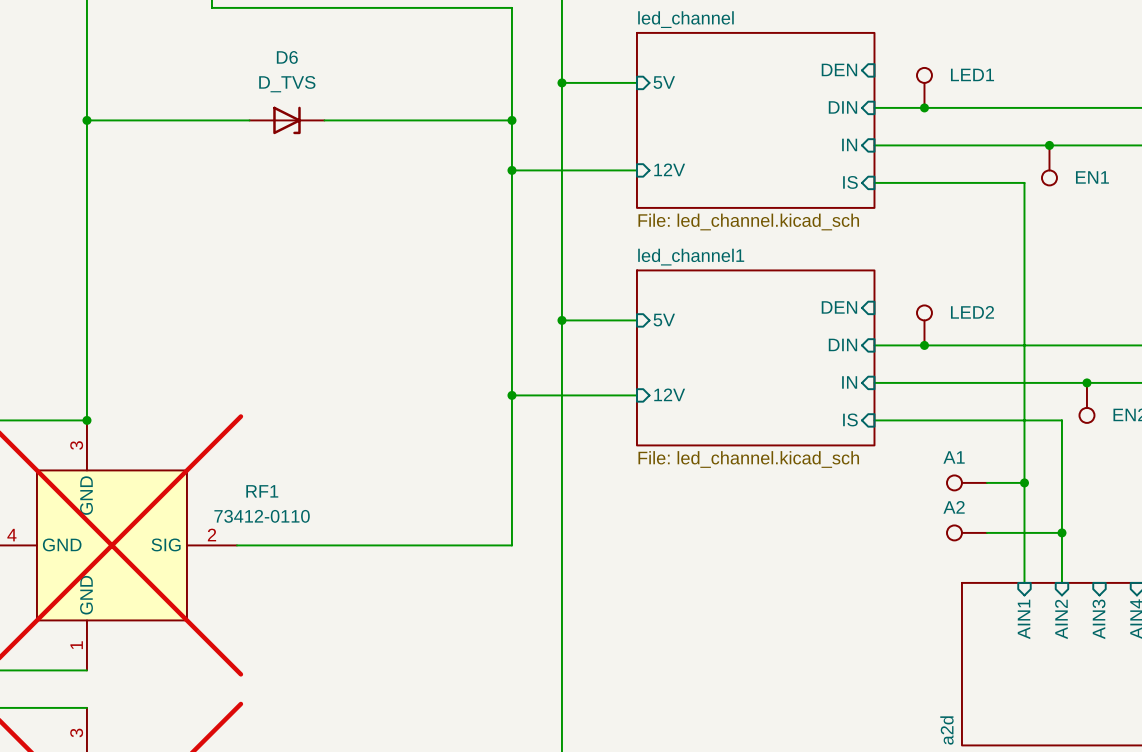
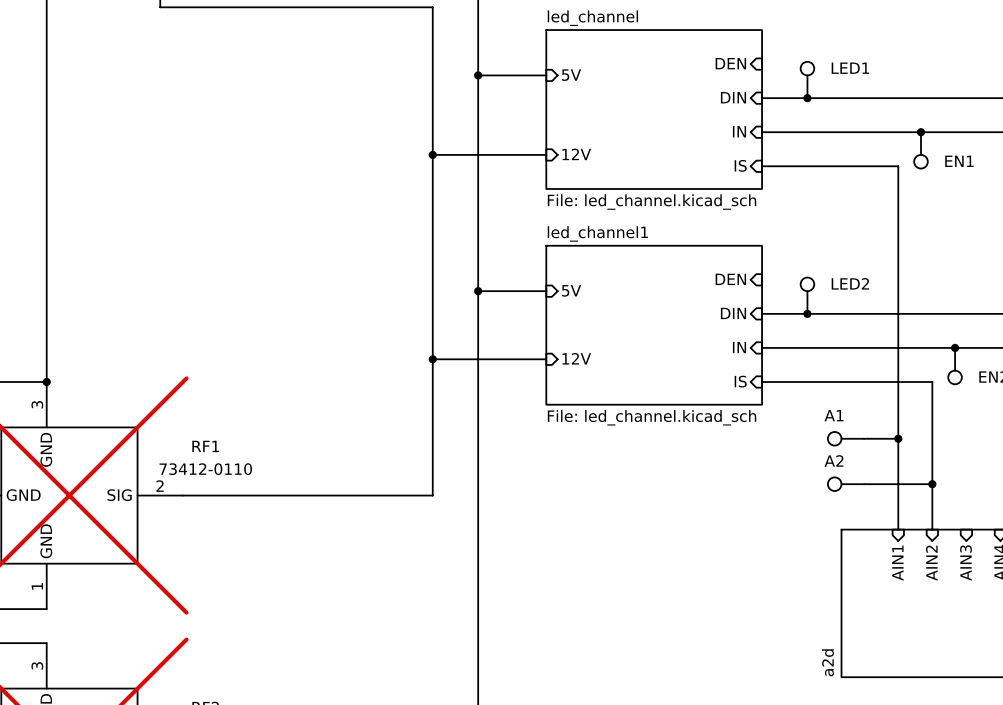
wire: (86, 120) (249, 120) -> none
junction: (86, 120) -> none
D6: D_TVS (286, 120) -> none
wire: (324, 120) (511, 120) -> none
junction: (511, 120) -> none

